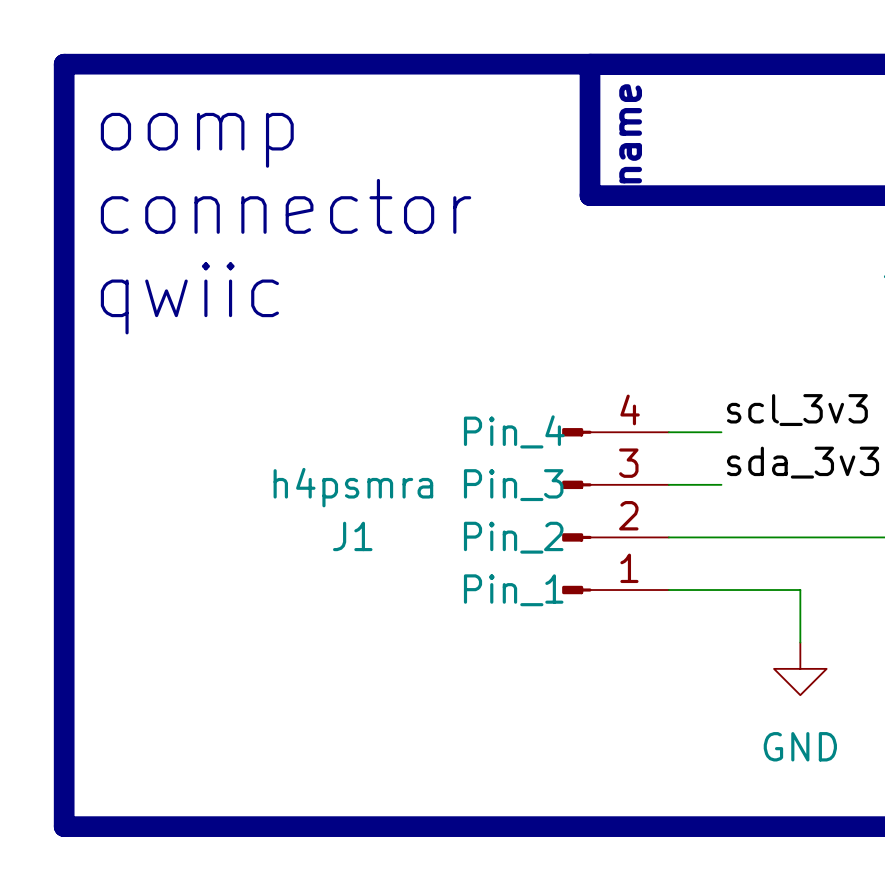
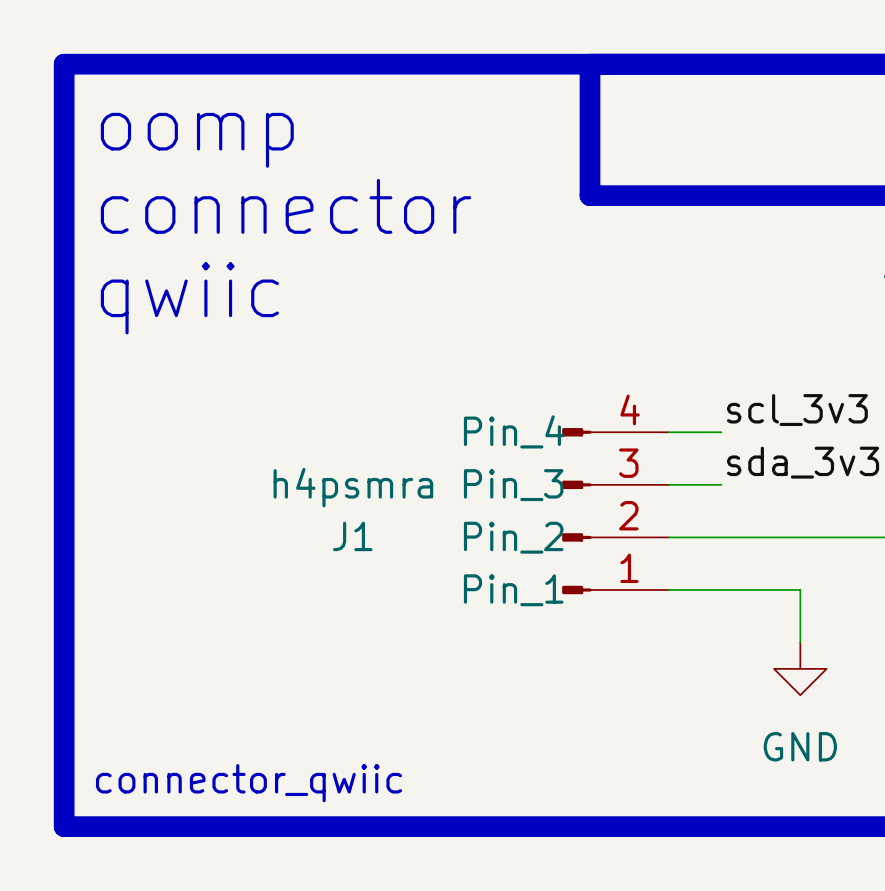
text: name (630, 133) -> none
text: none -> connector_qwiic (249, 783)

